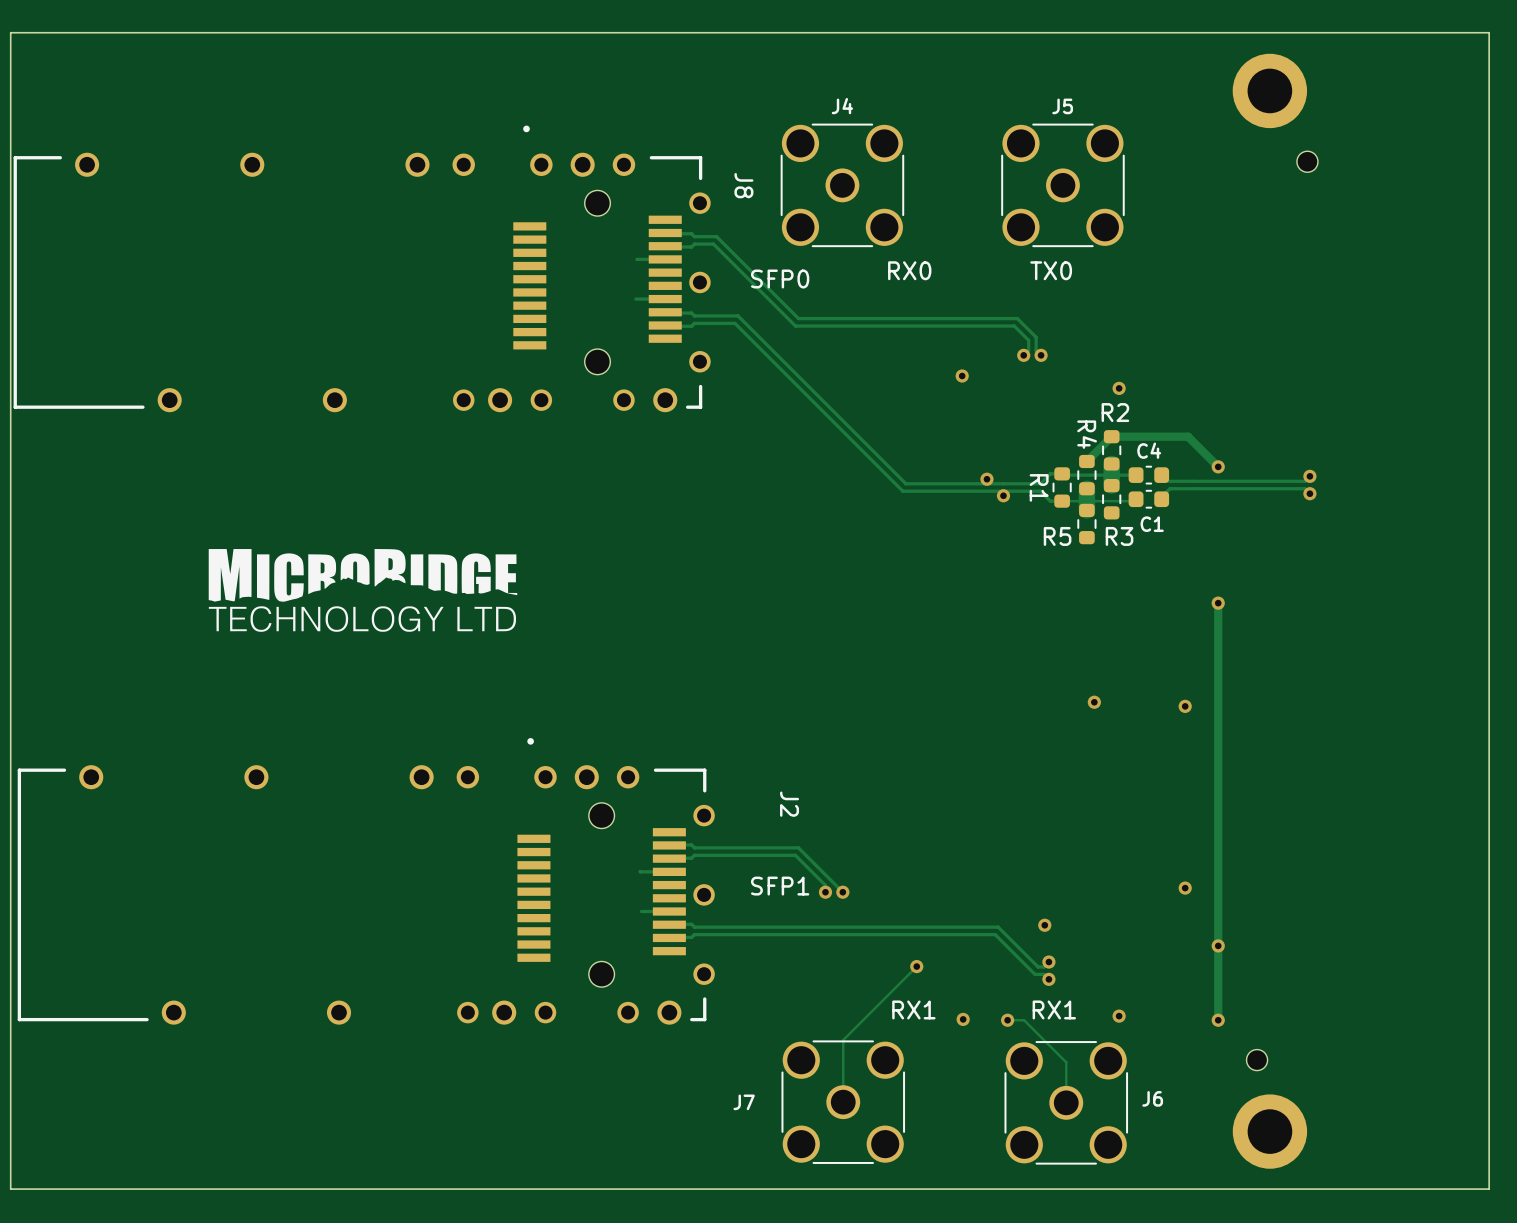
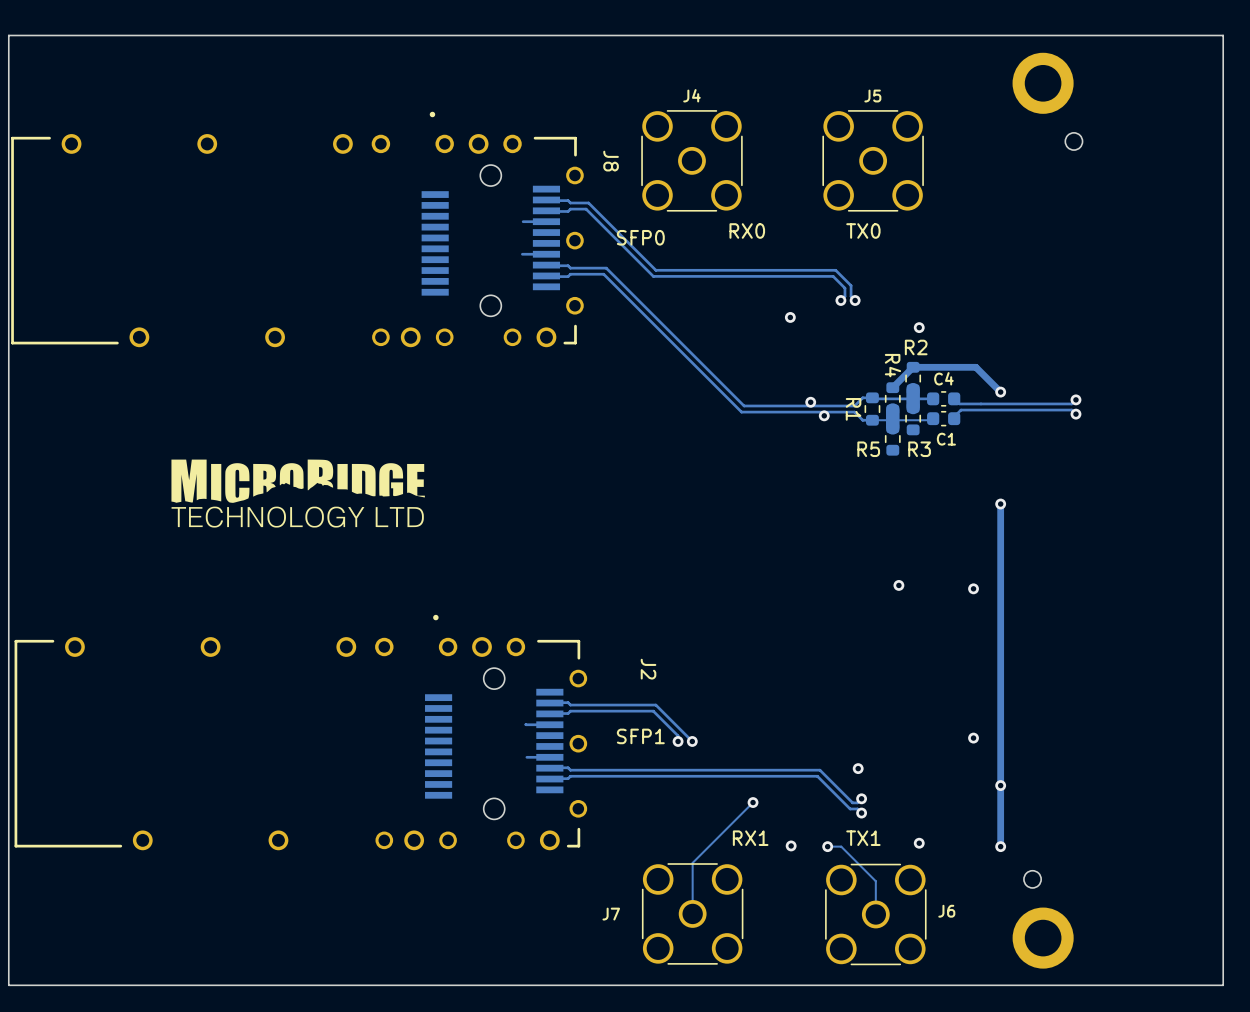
text: RX1 (1054, 1009) -> TX1 (863, 838)

